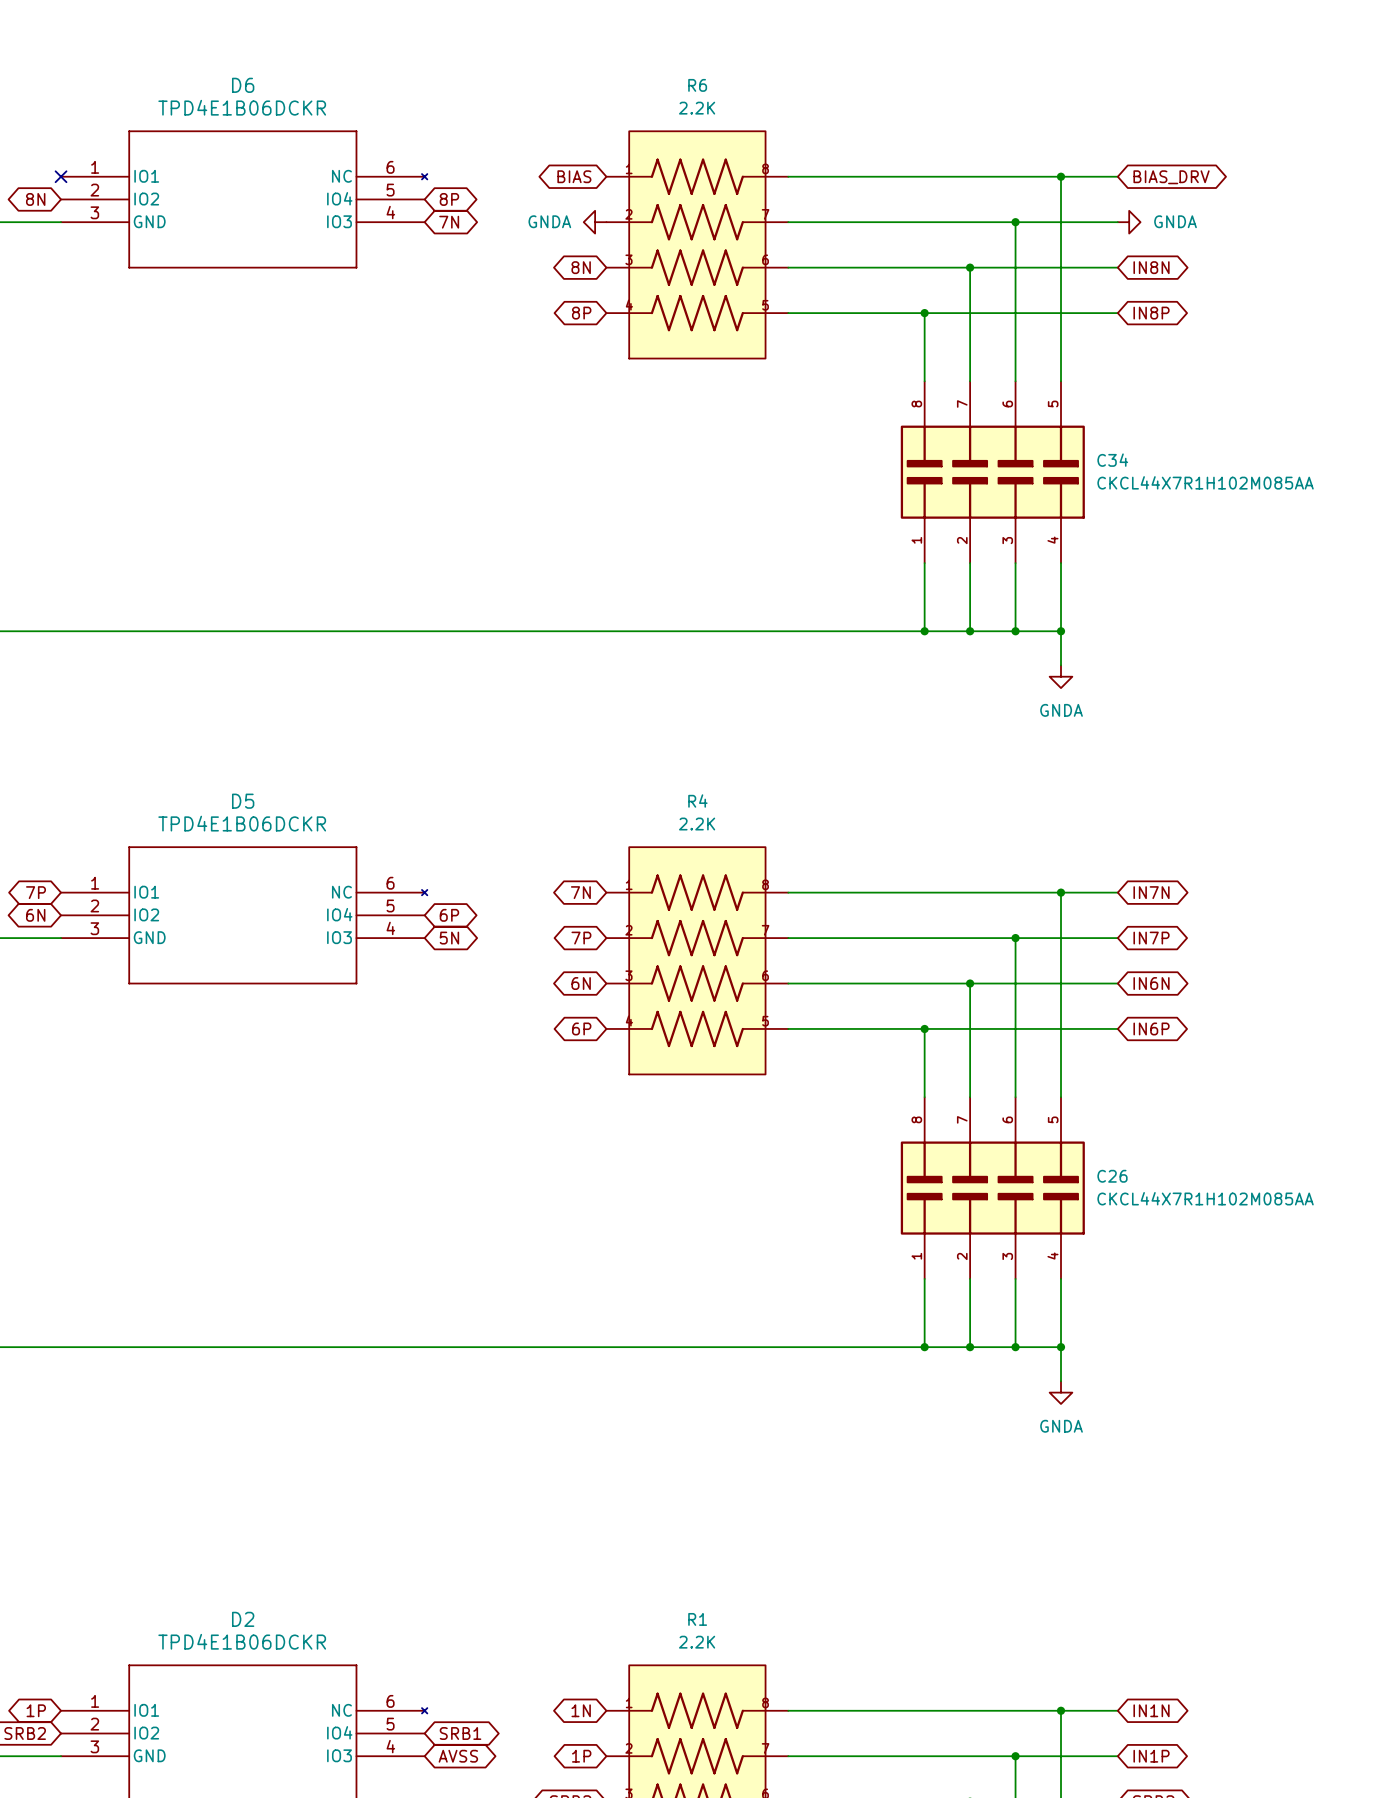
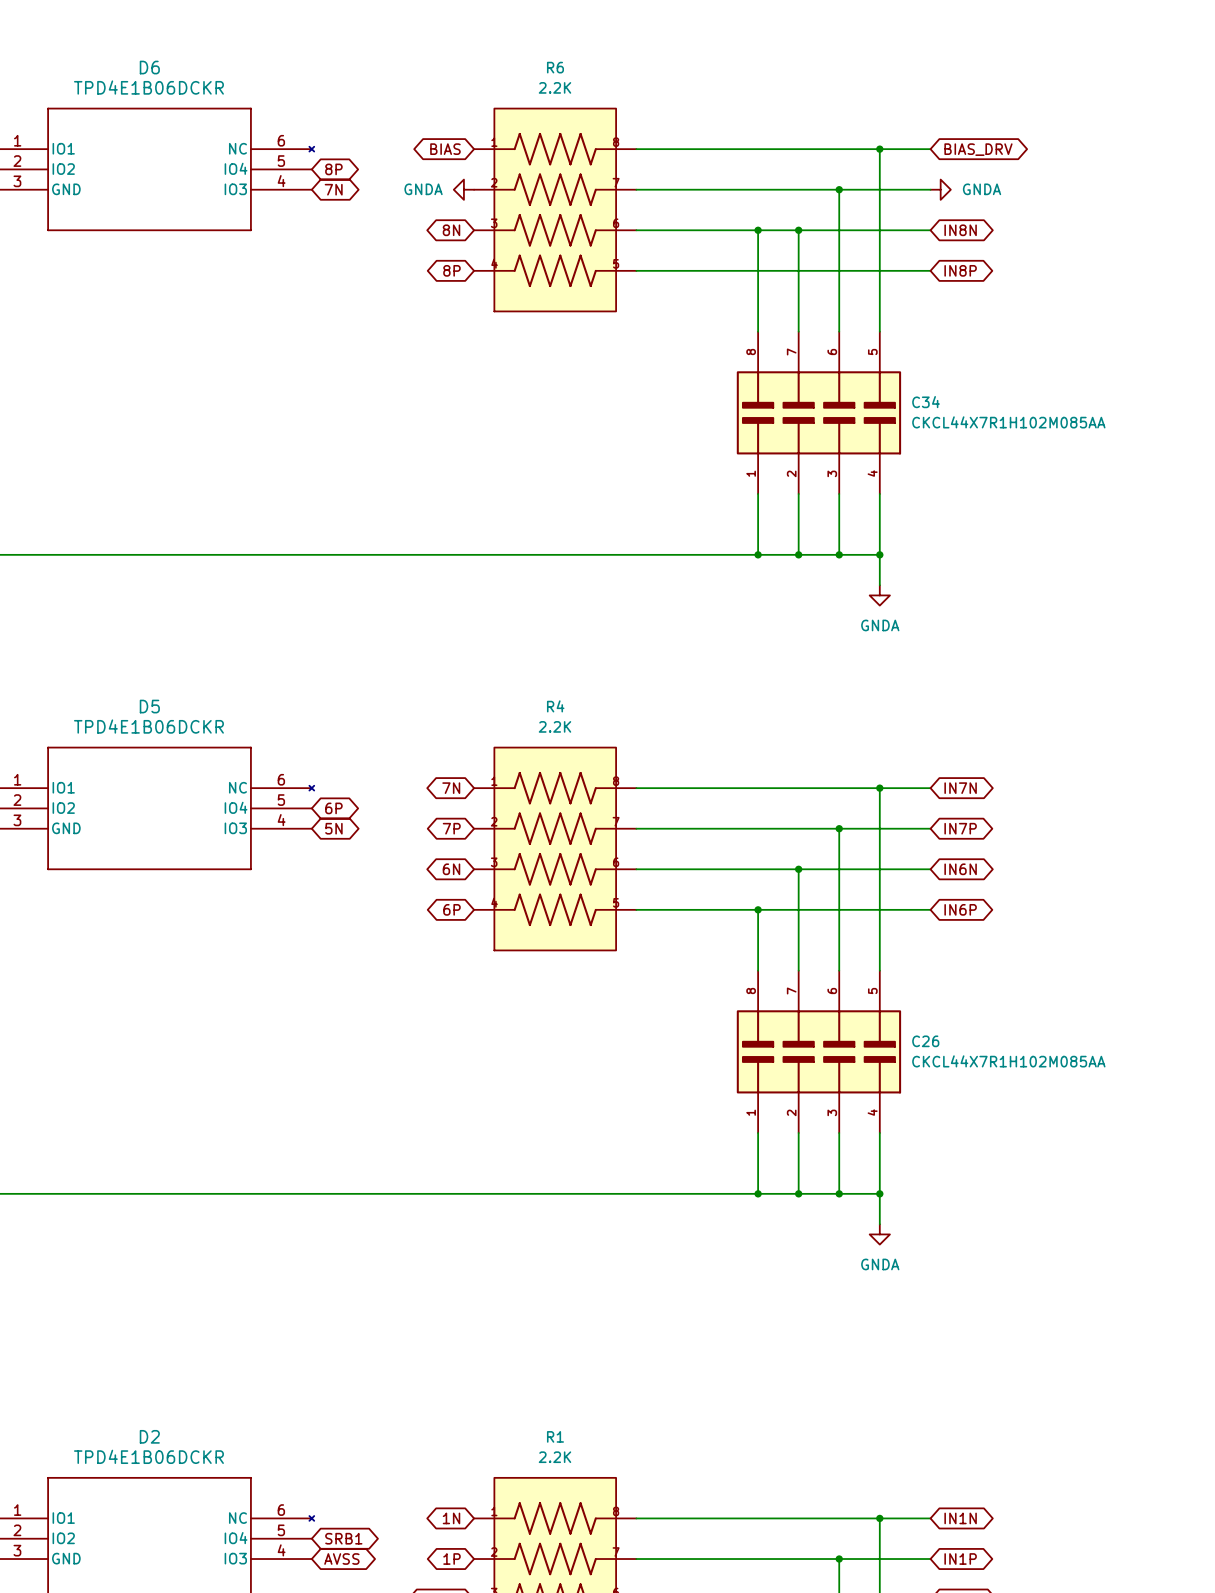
wire: none -> (758, 230) (758, 270)
junction position: (924, 313) -> (758, 230)

